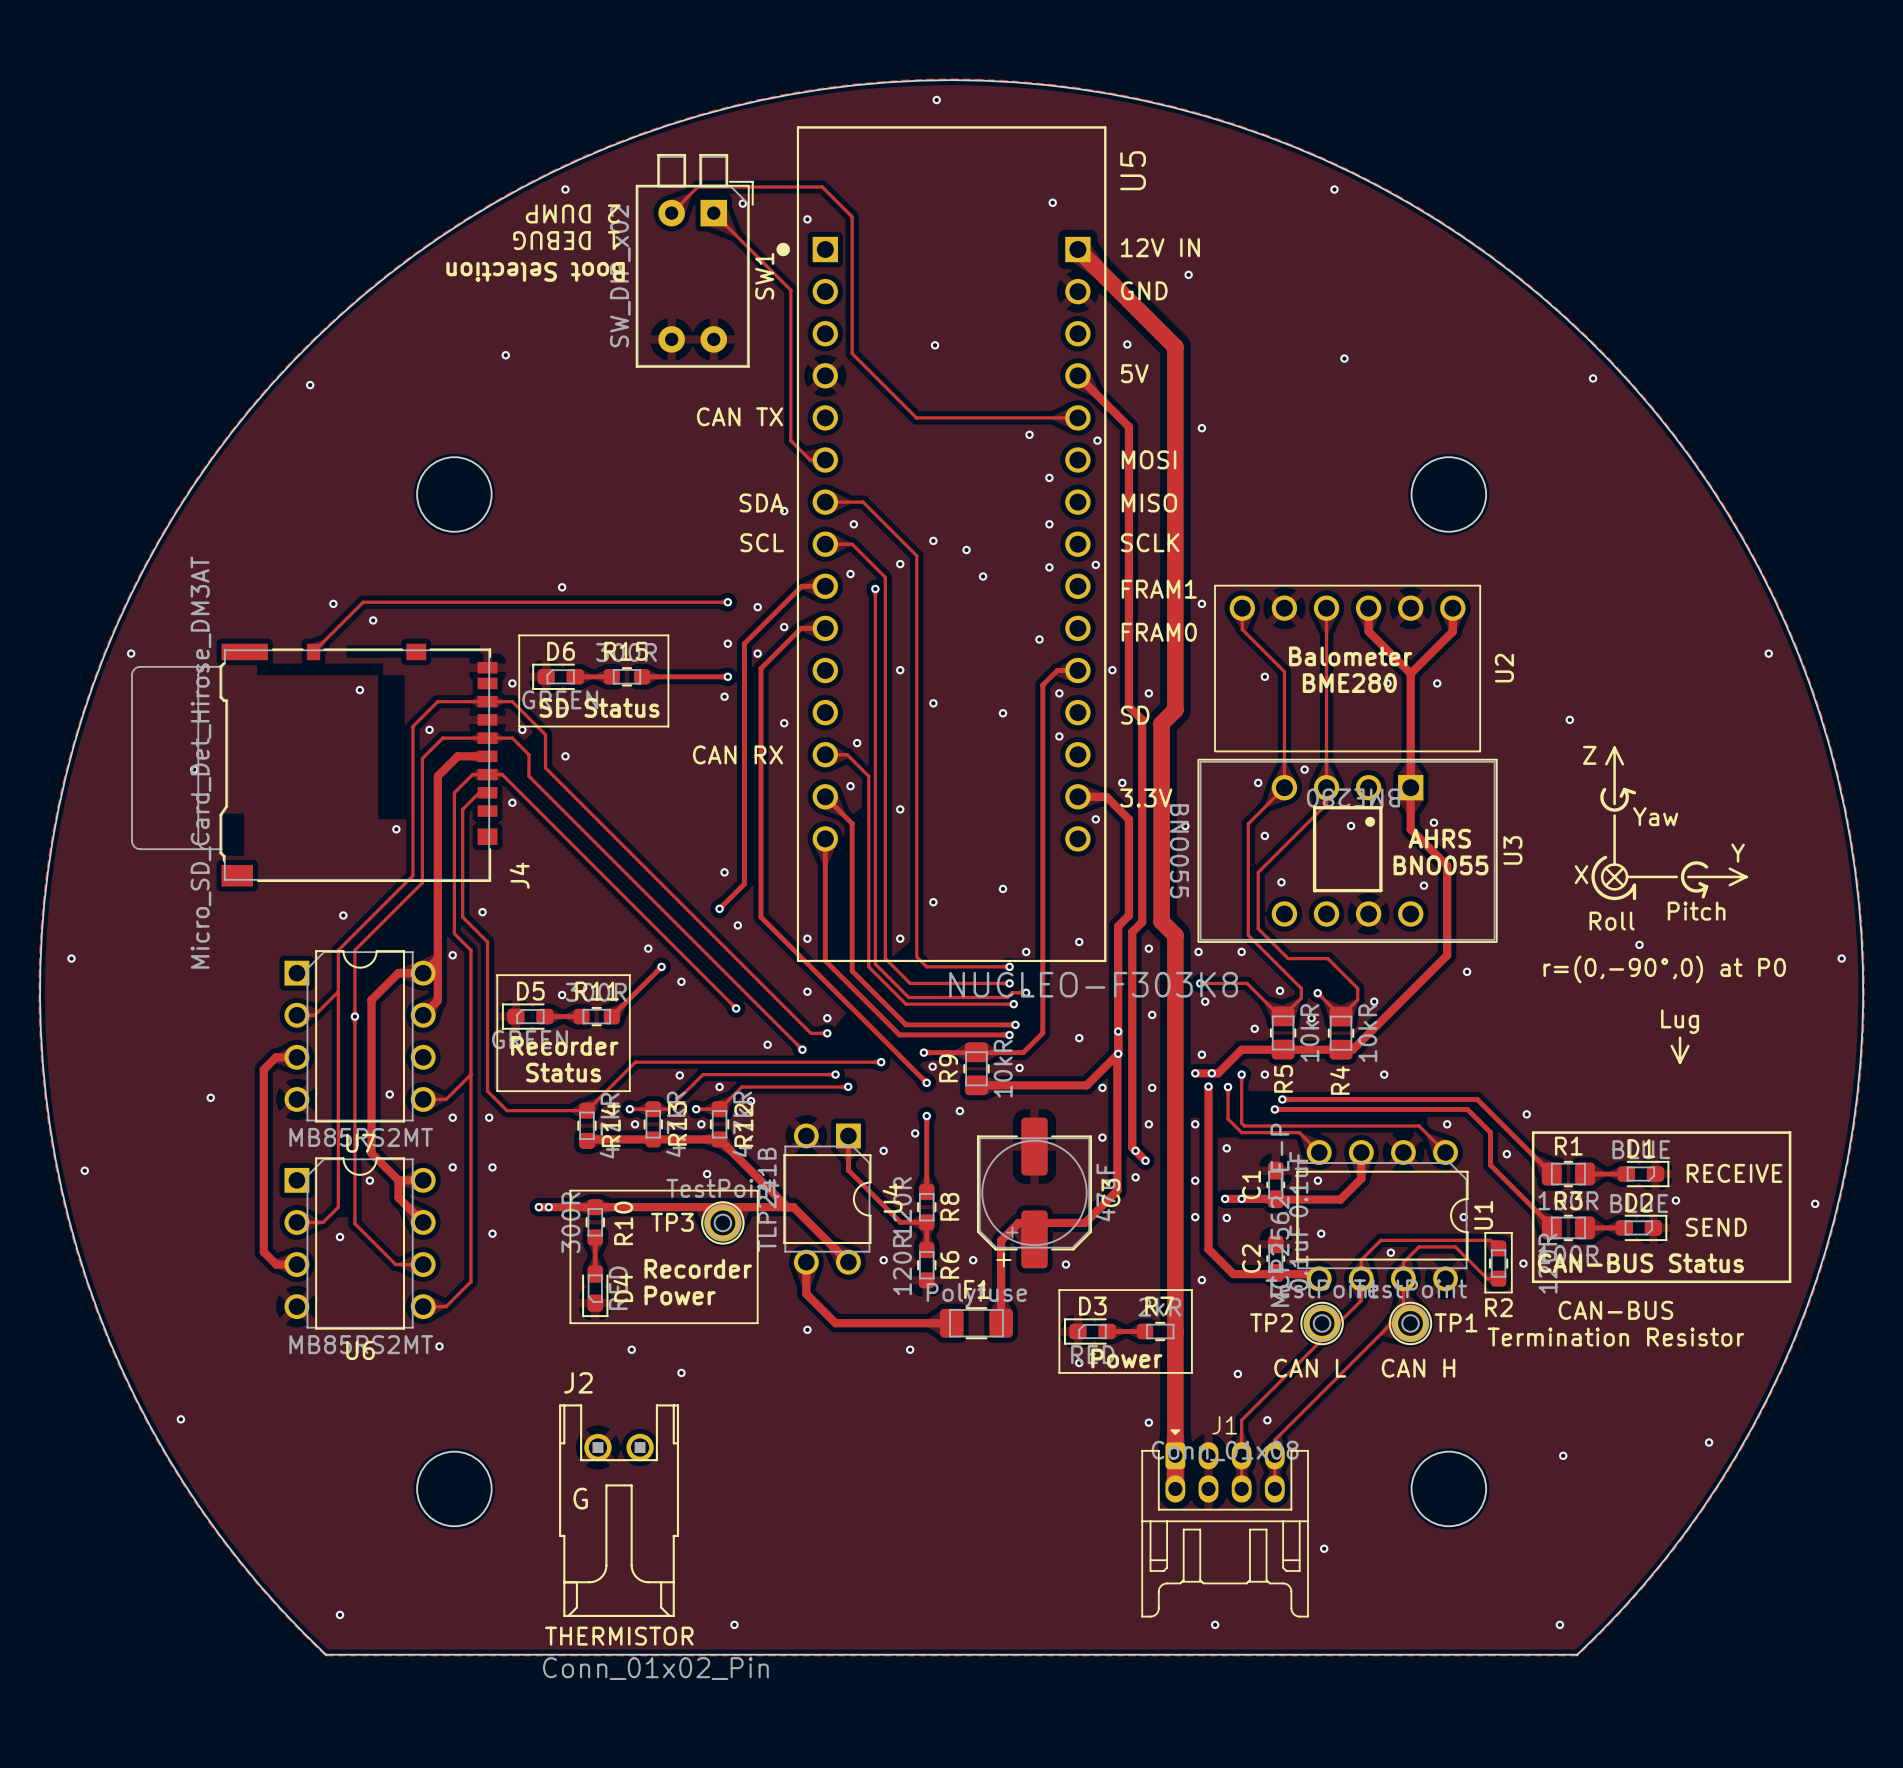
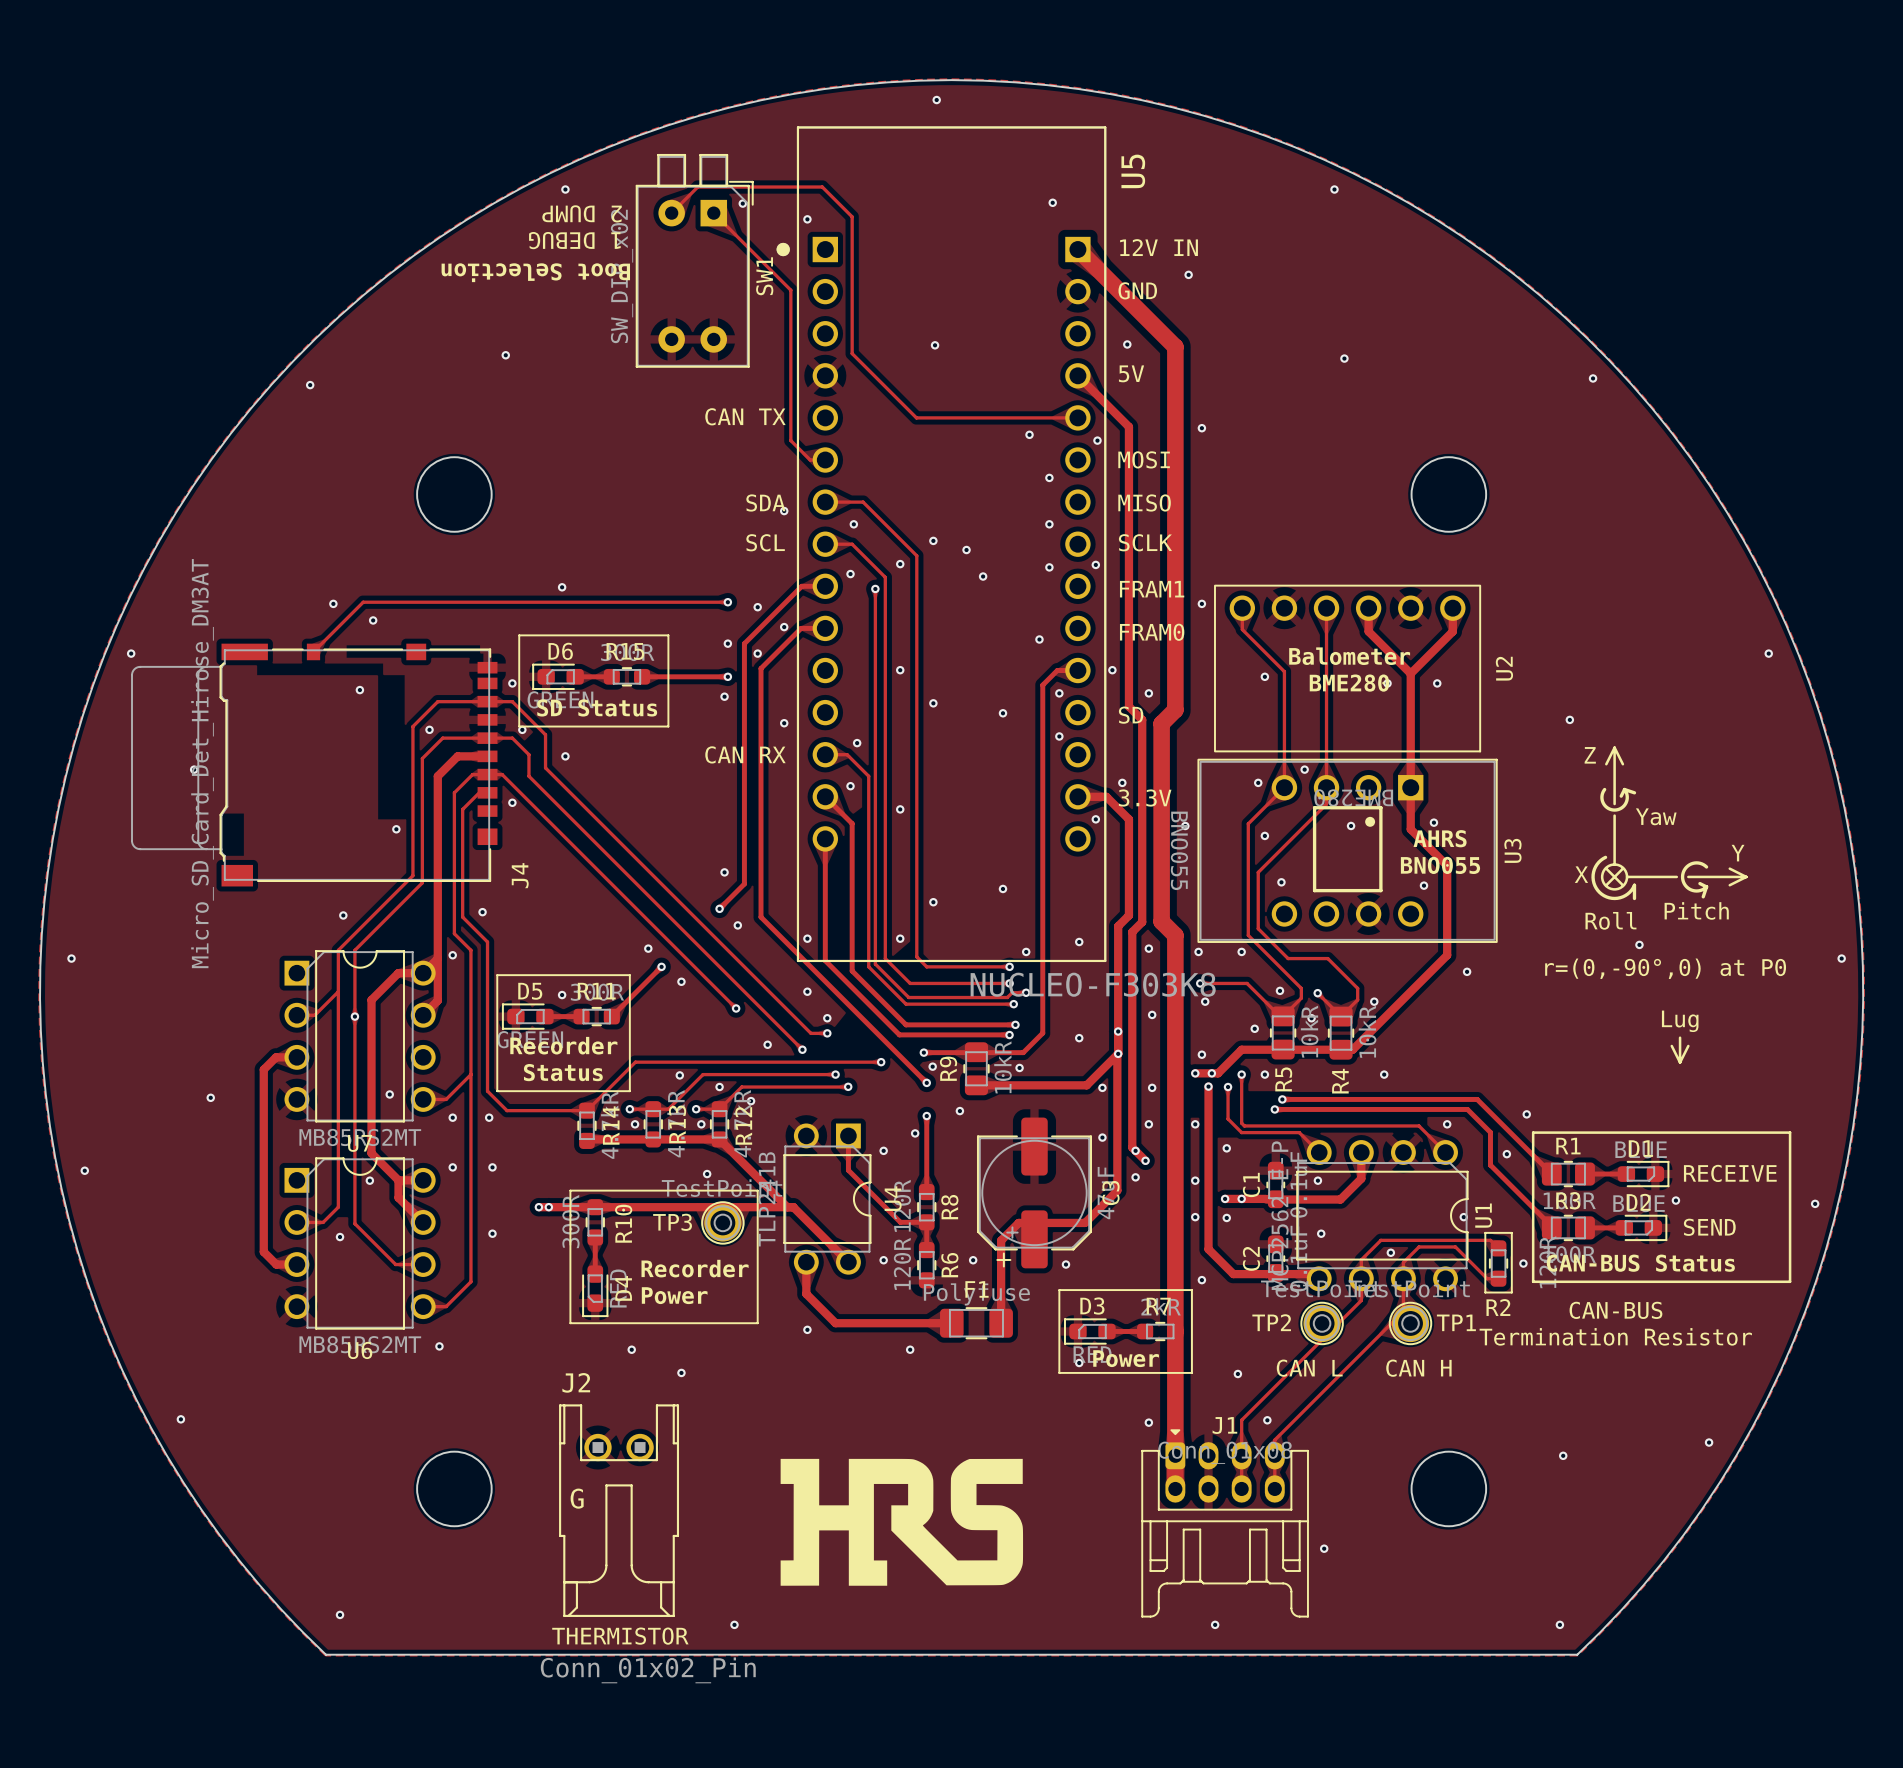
drawing: none -> [780, 1458, 1024, 1586]

